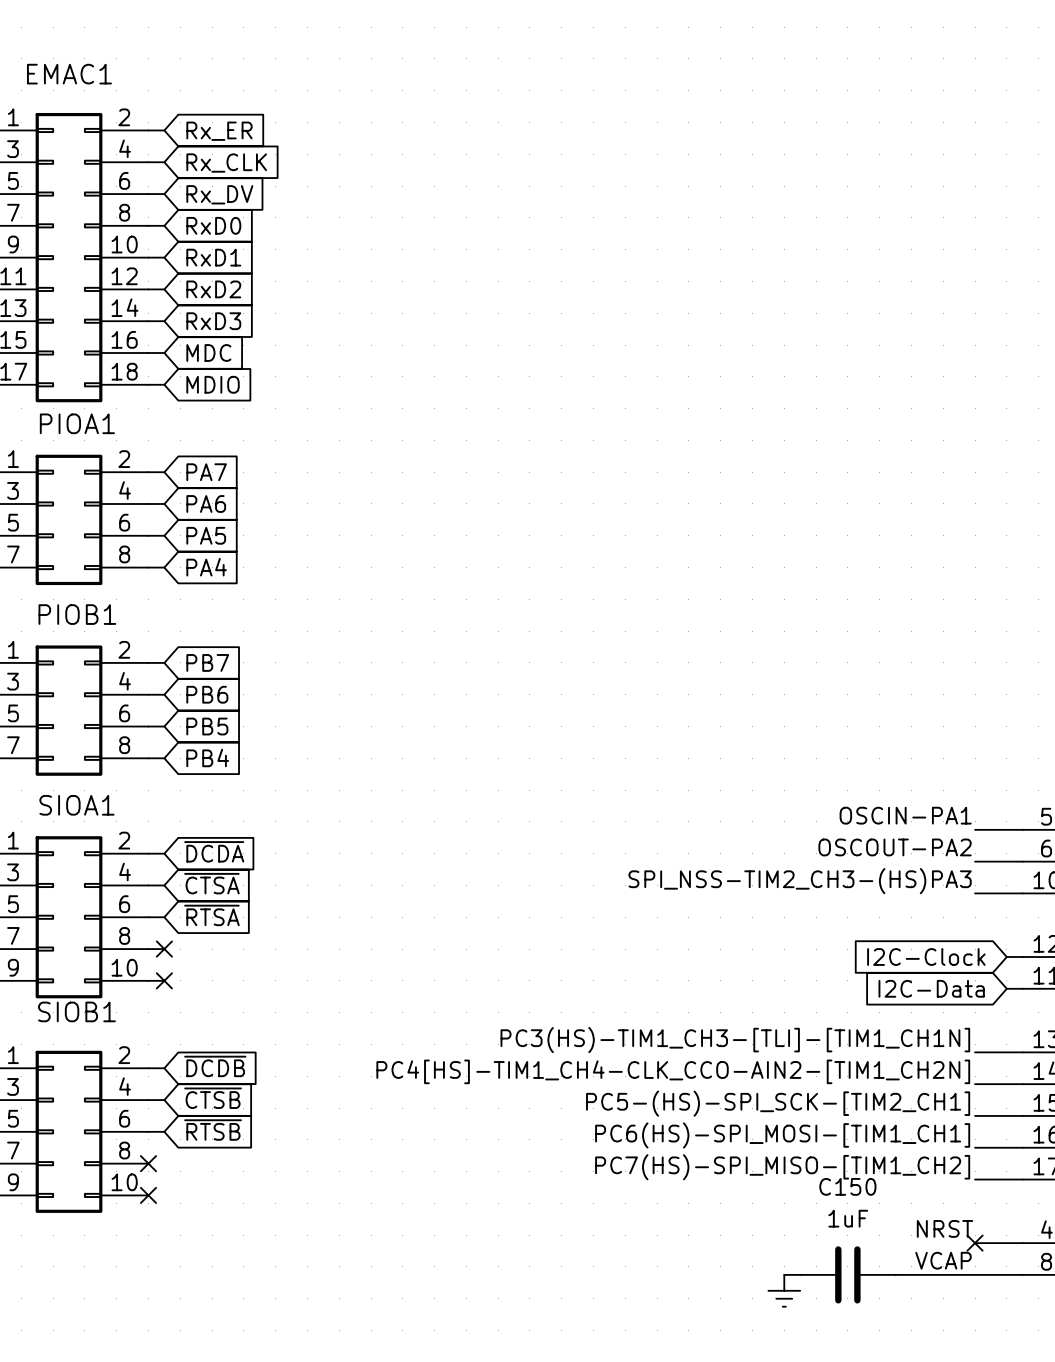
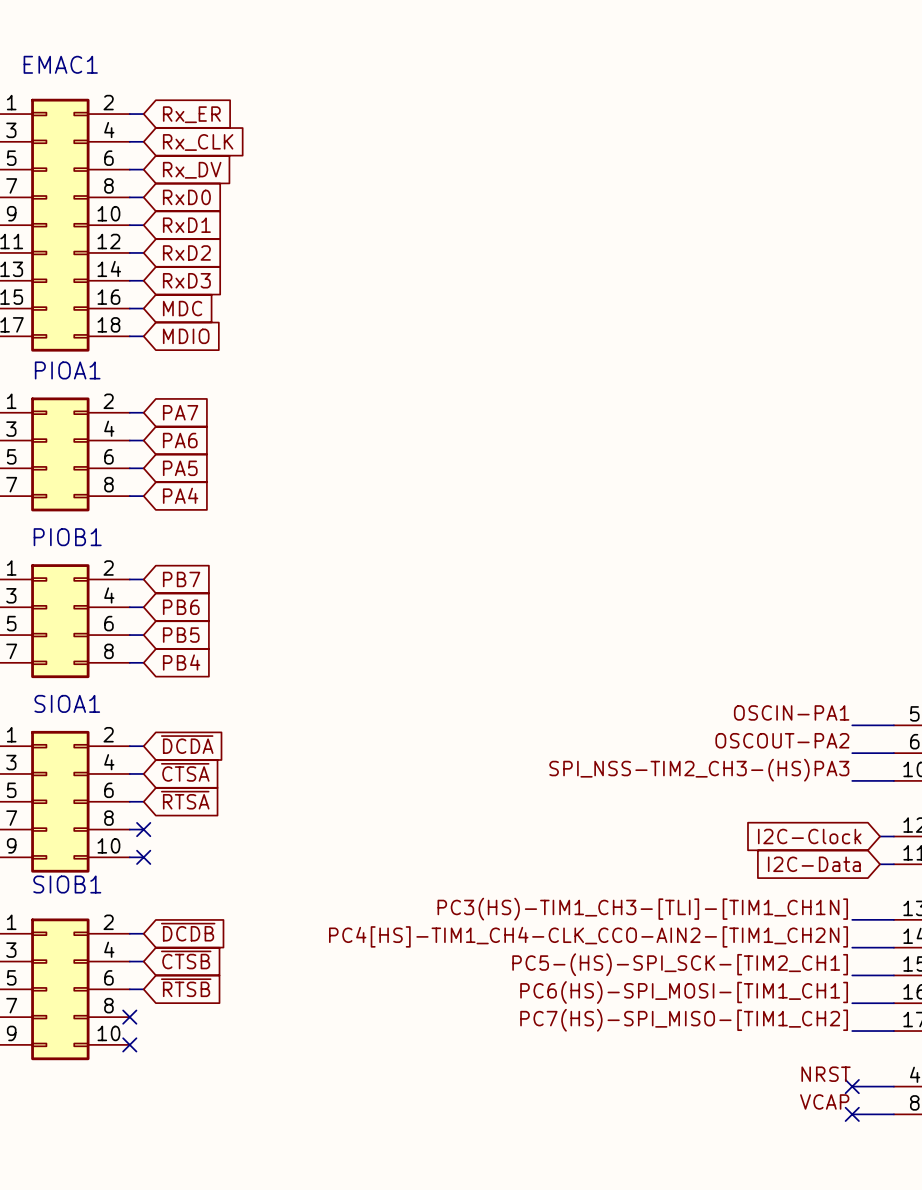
wire: (784, 1274) (800, 1274) -> none
C150: 1uF (847, 1274) -> none
wire: (895, 1274) (975, 1274) -> none
no-connect mark: none -> (852, 1114)
power symbol: (784, 1290) -> none

